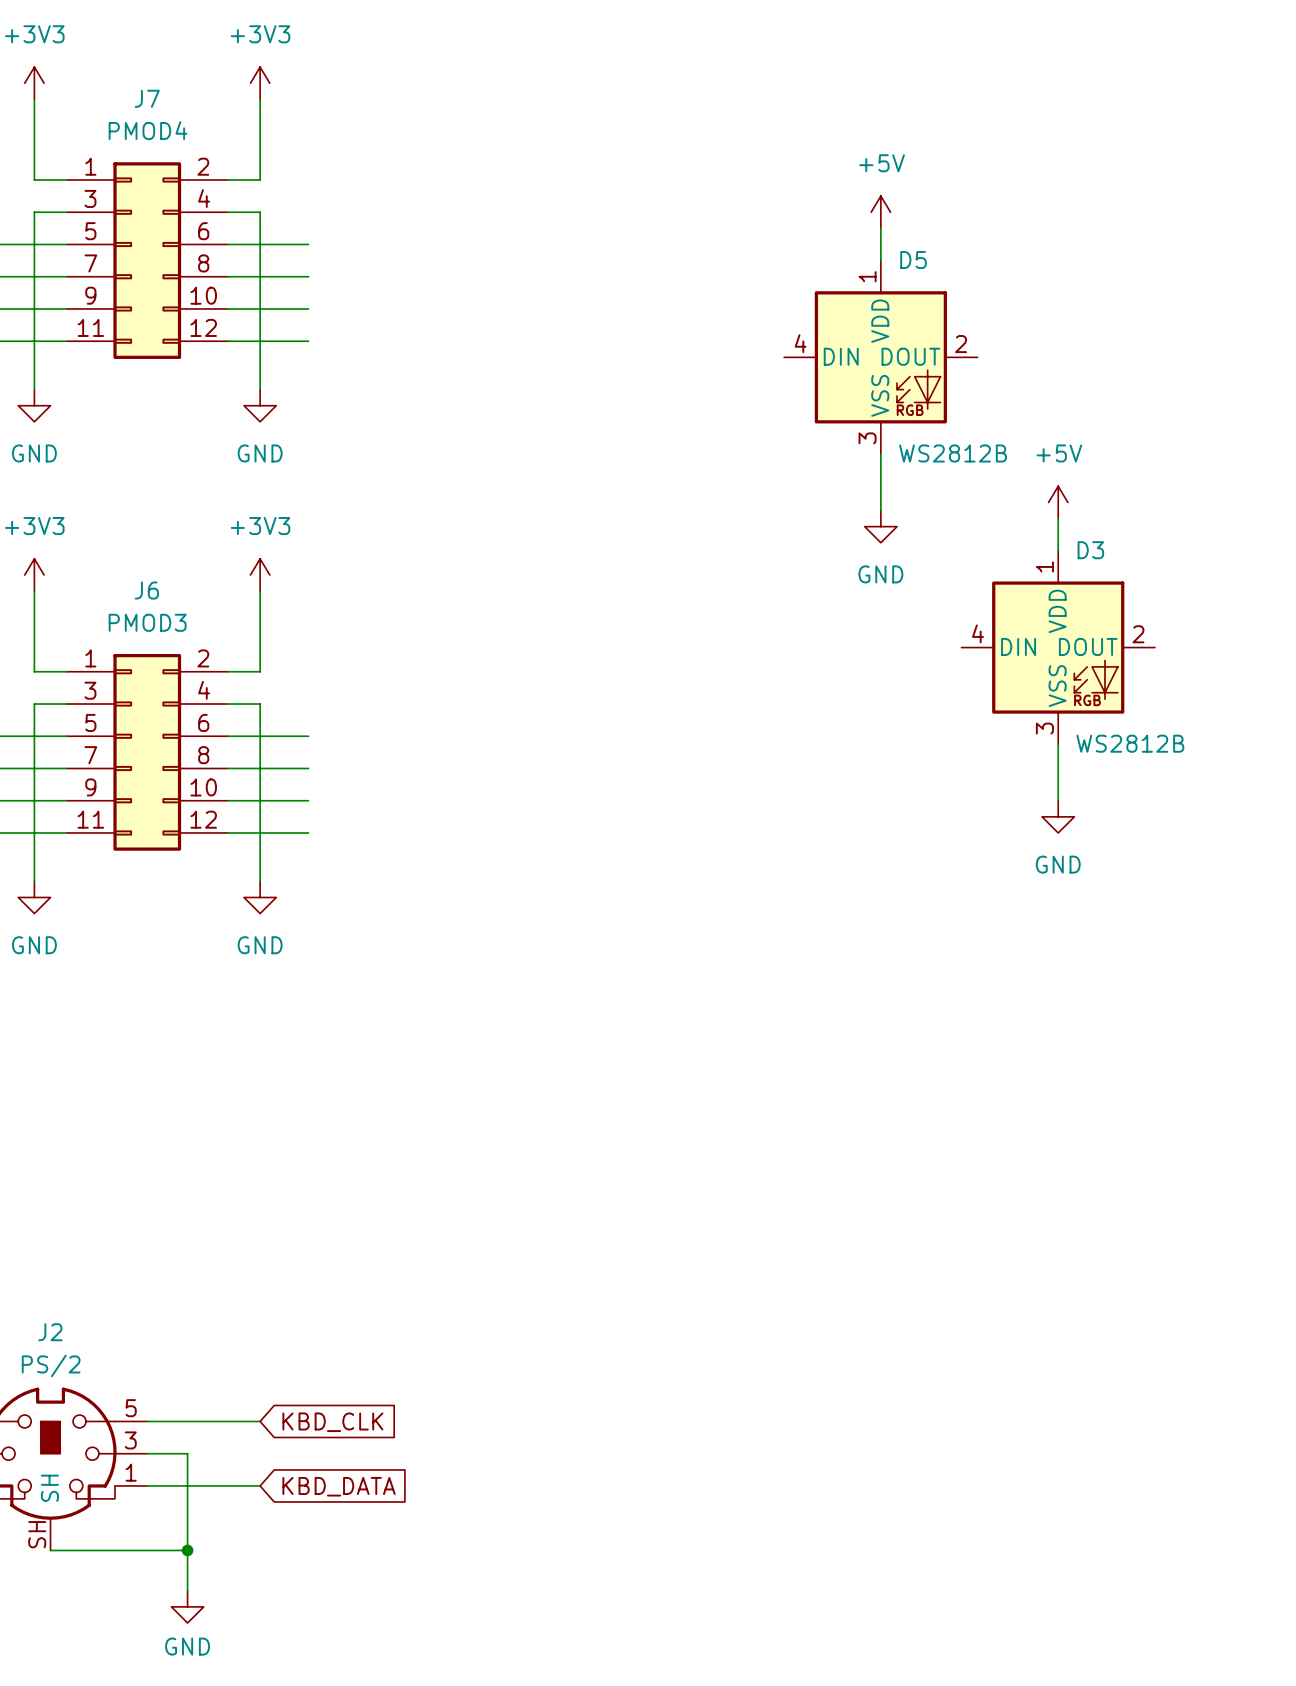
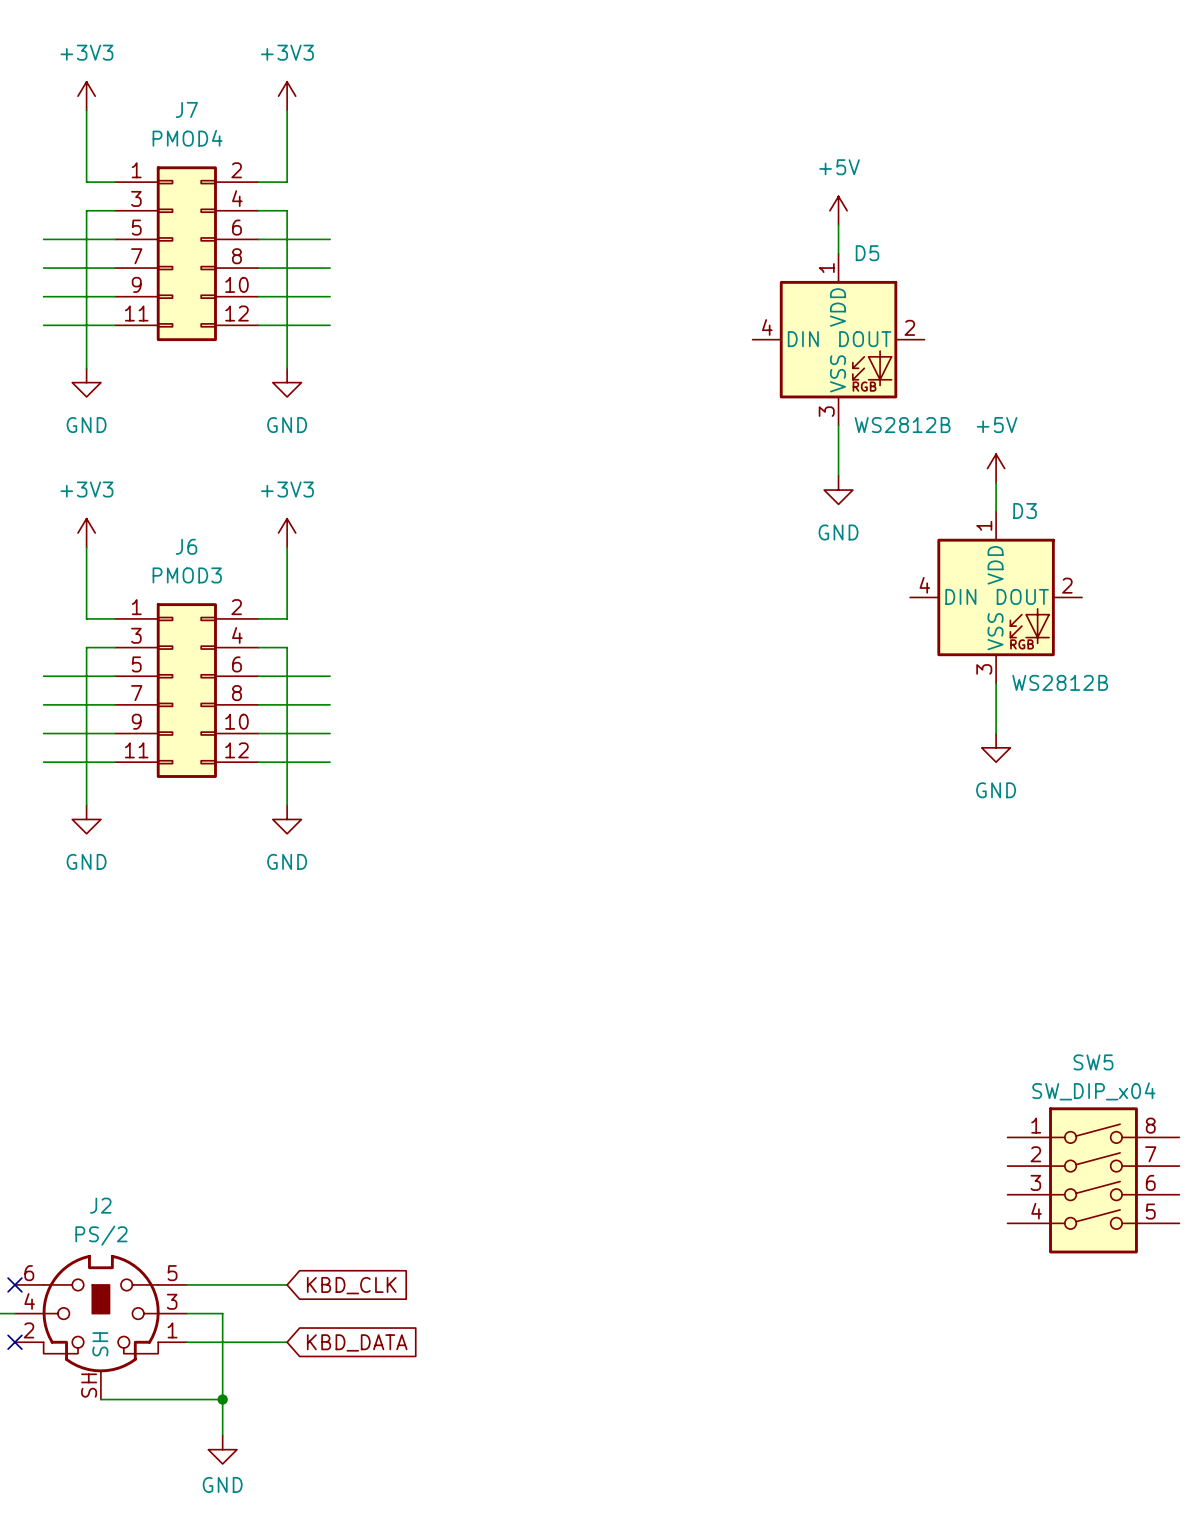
SW5: none -> SW_DIP_x04 (1093, 1180)

